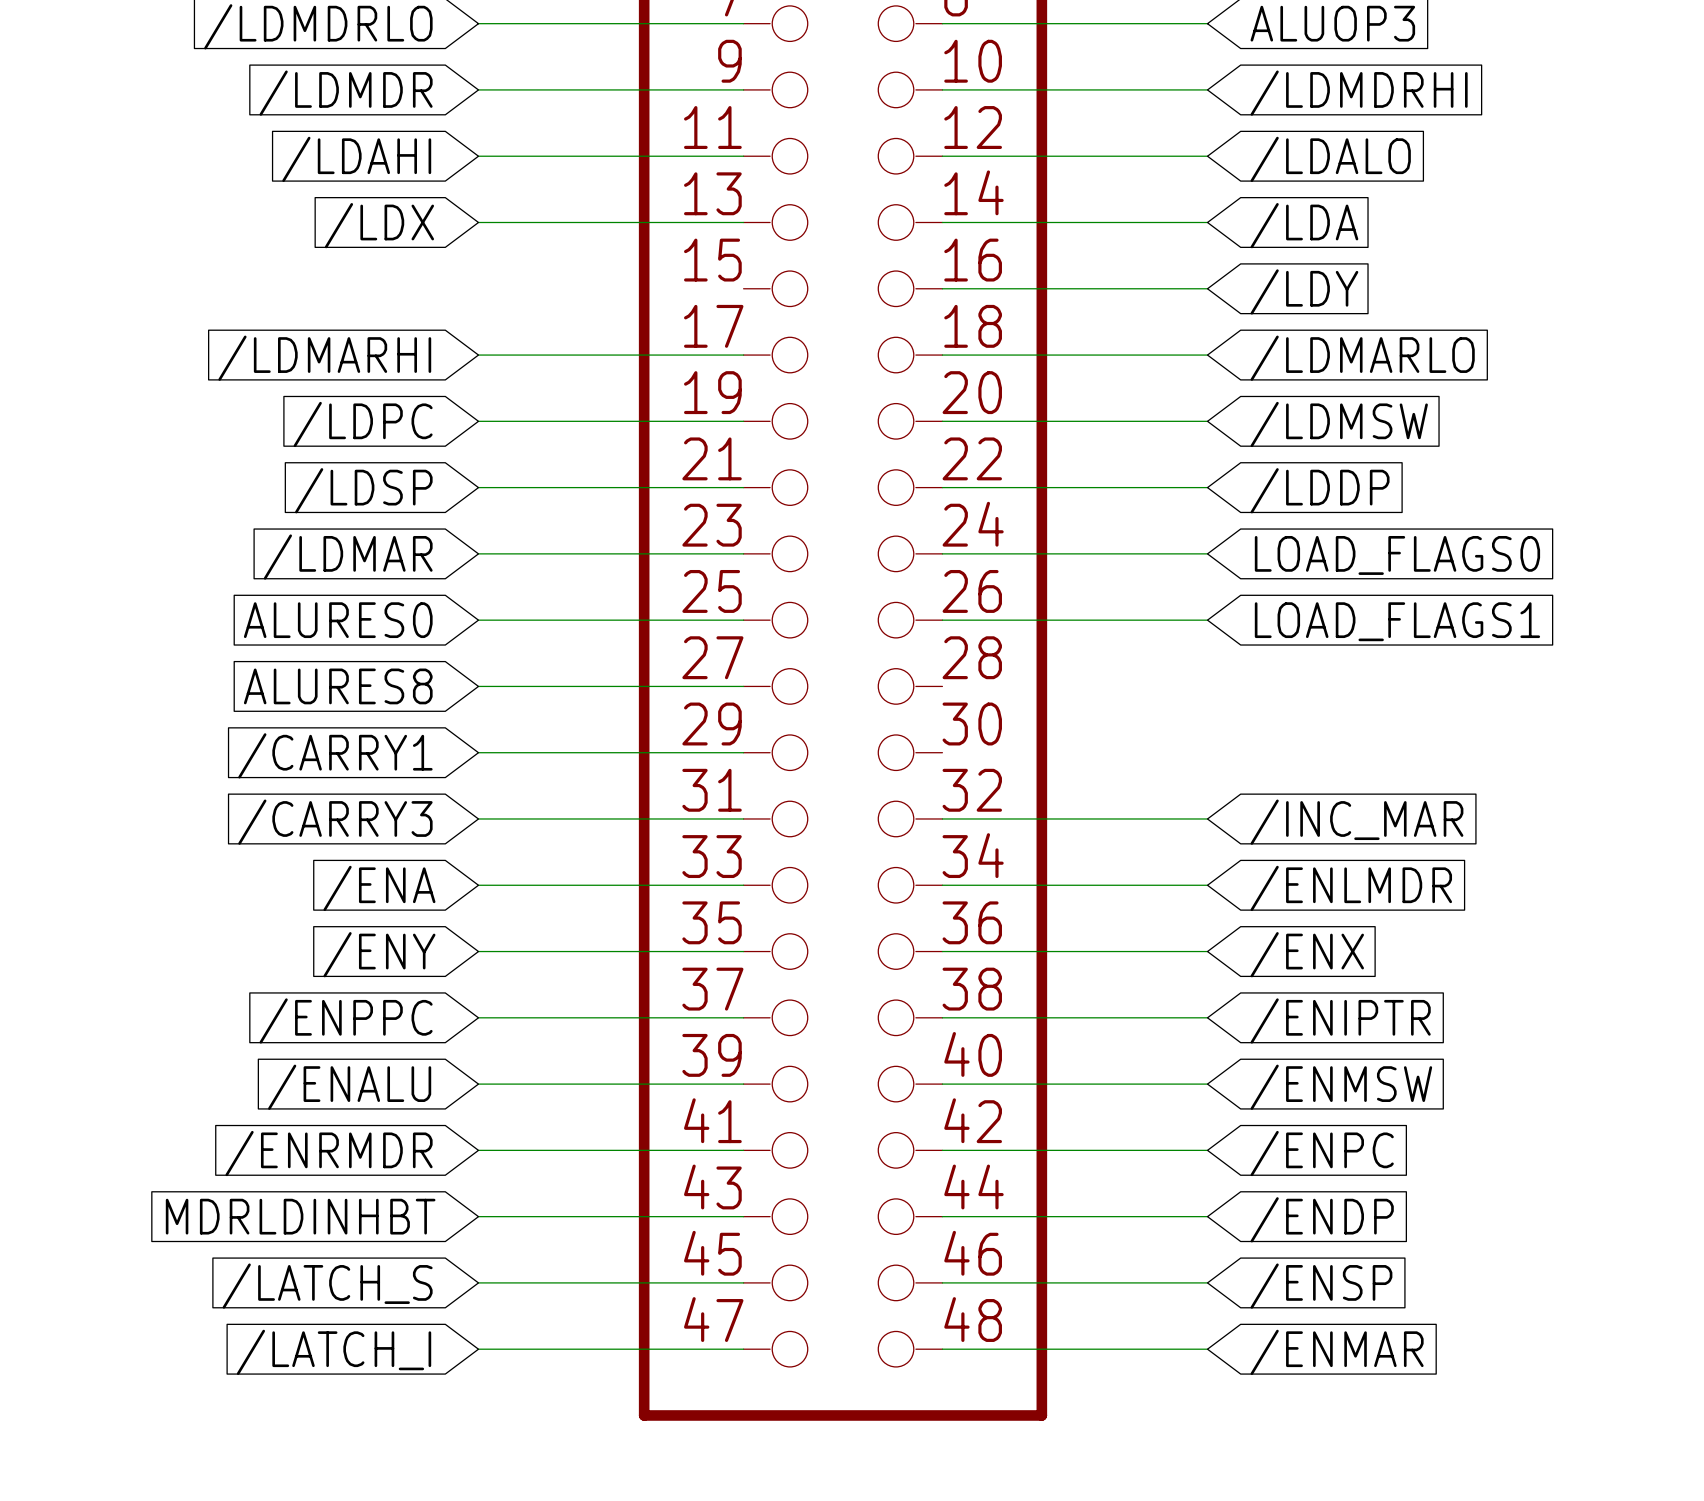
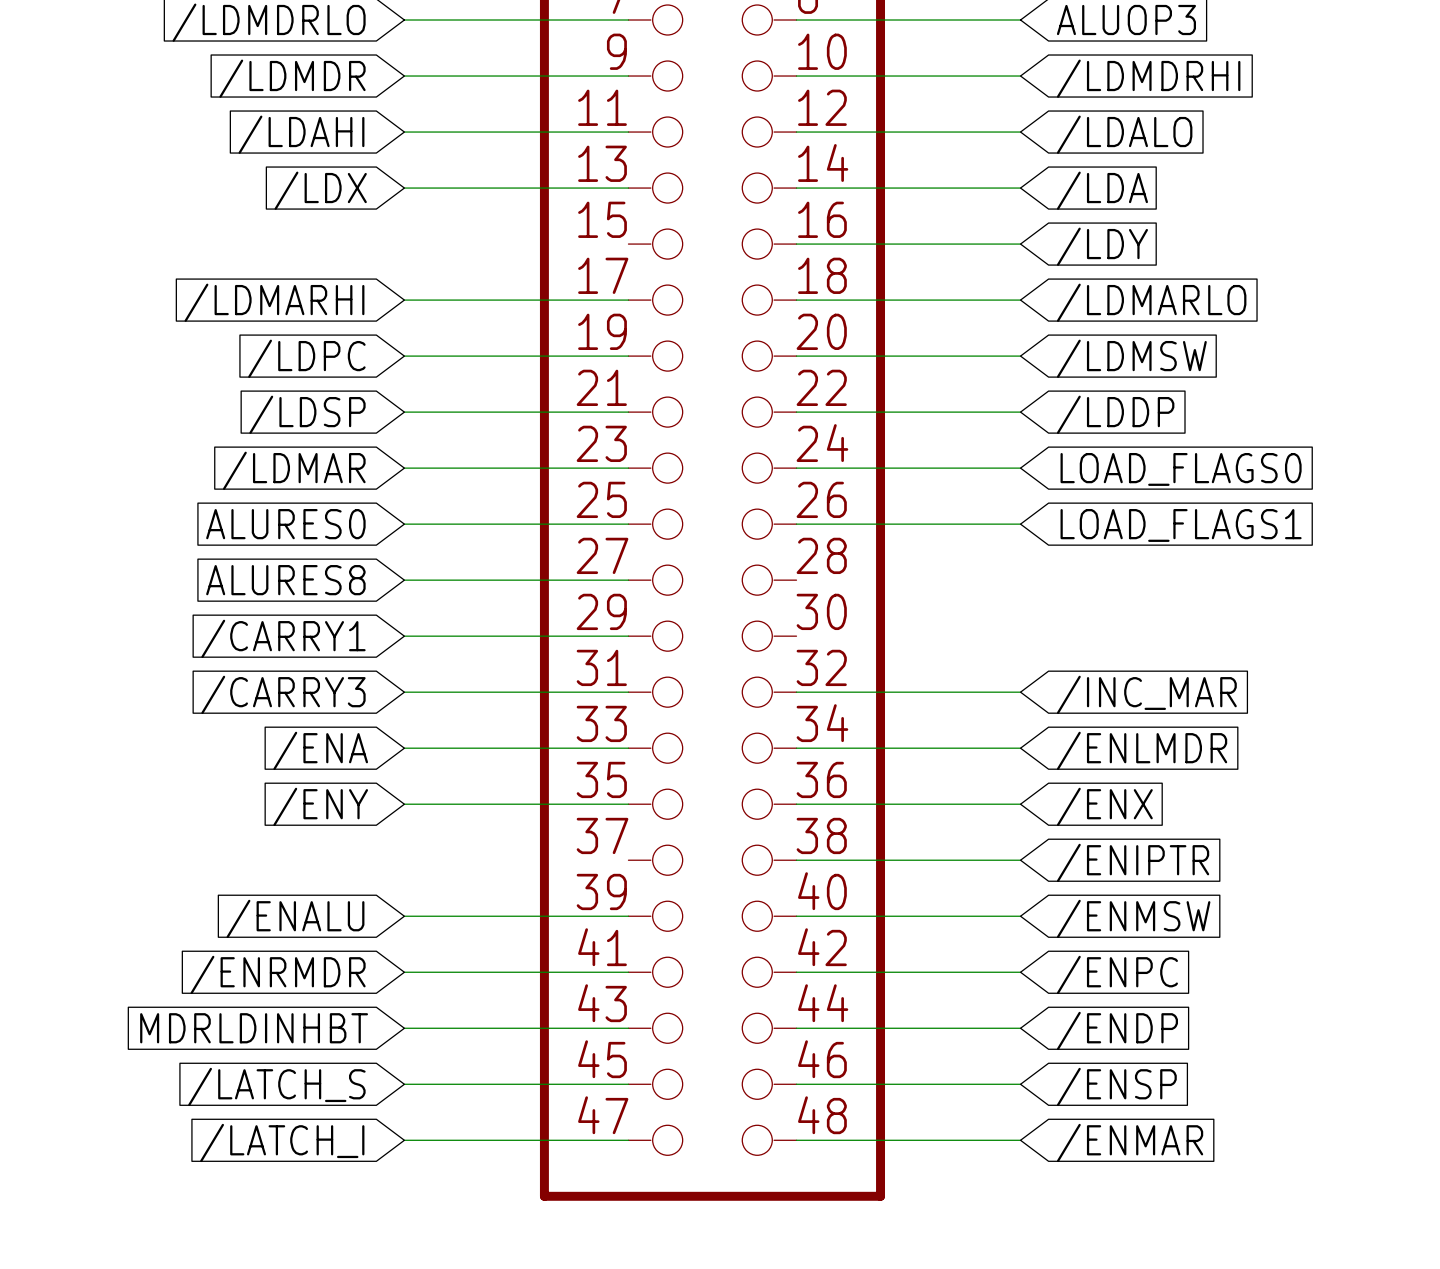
wire: (478, 1017) (743, 1017) -> none
global label: /ENPPC (346, 1020) -> none

